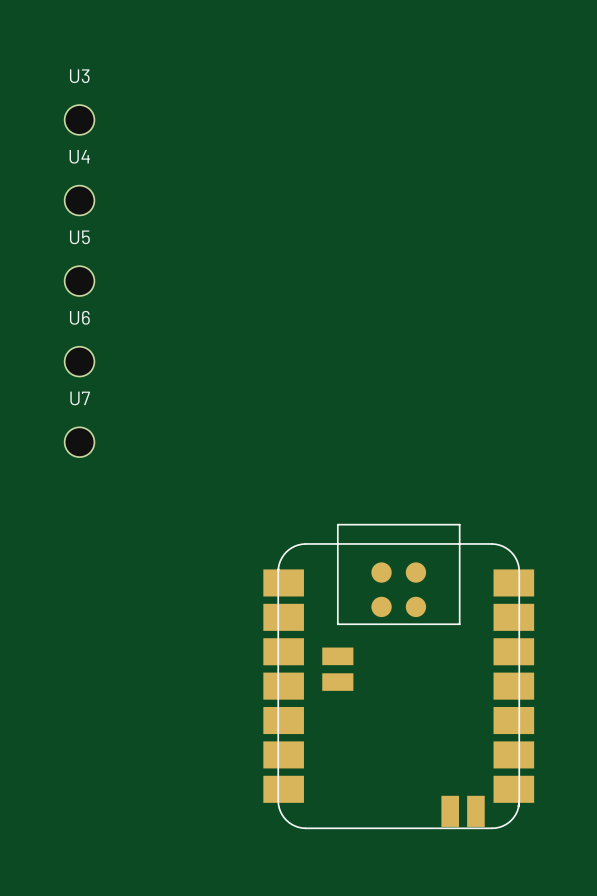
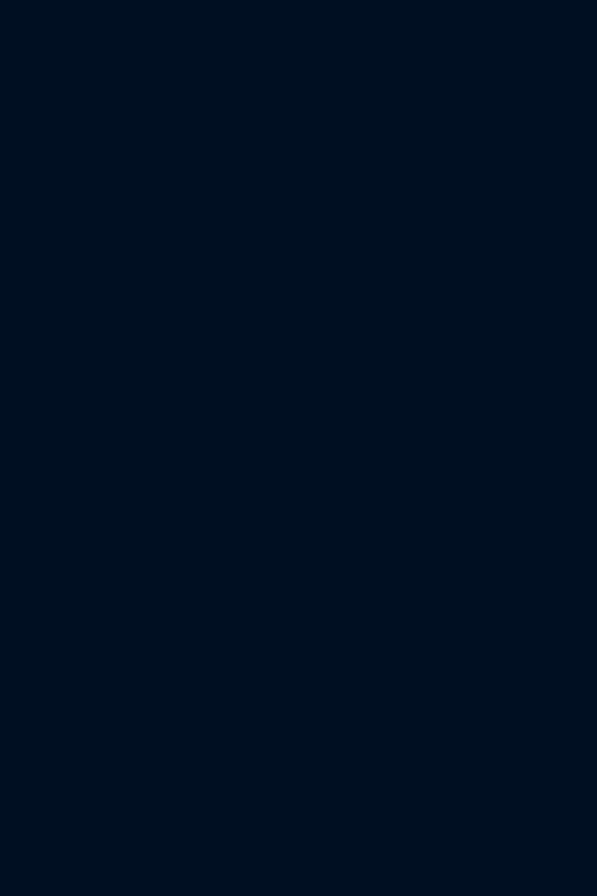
U3: (79, 119) -> none
U4: (79, 200) -> none
U5: (79, 281) -> none
U6: (79, 361) -> none
U7: (79, 442) -> none
part: (398, 676) -> none

